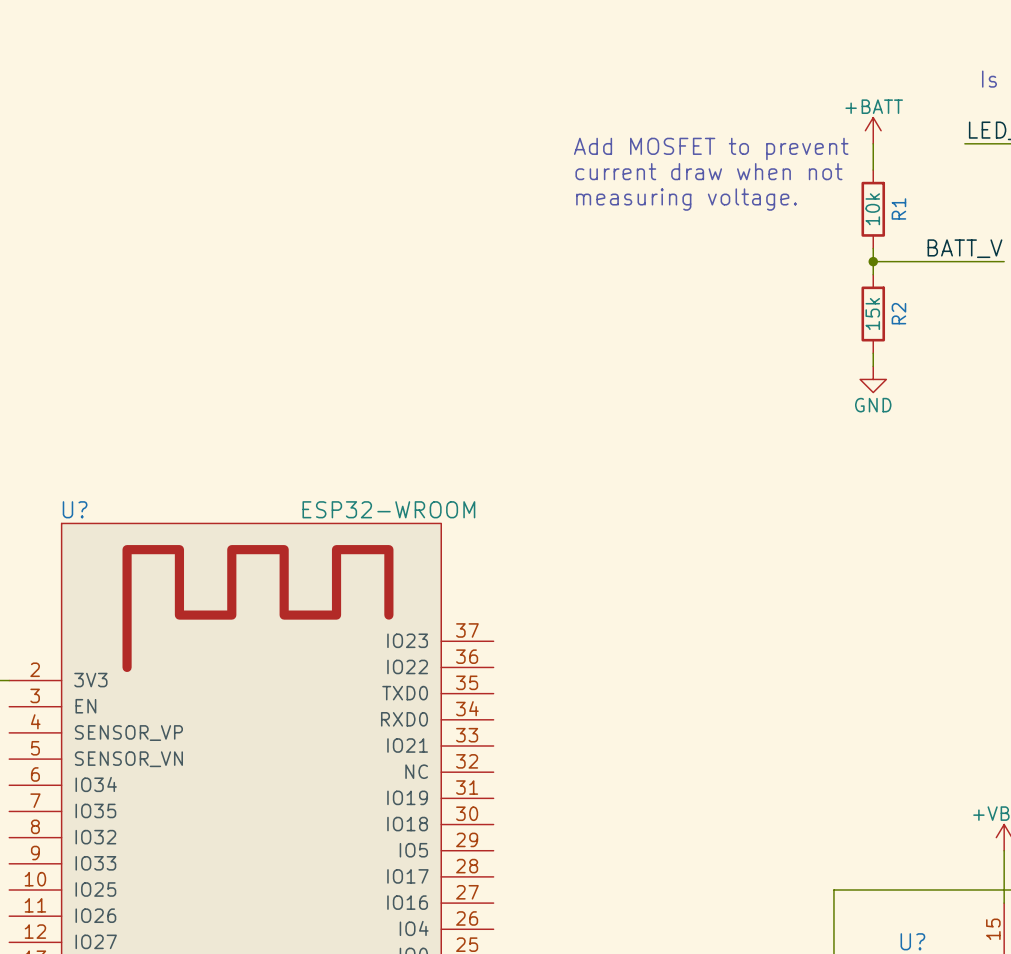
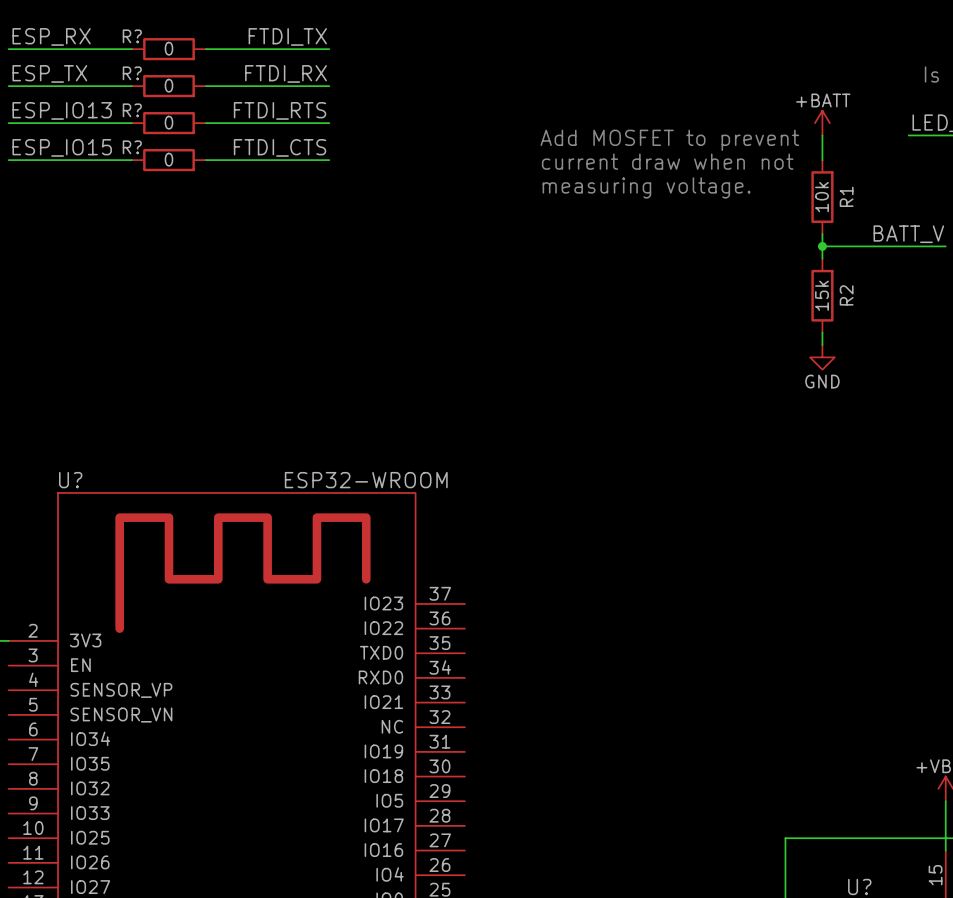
label: none -> ESP_RX (51, 36)
label: none -> FTDI_TX (287, 36)
wire: none -> (8, 49) (132, 49)
R?: none -> 0 (168, 49)
wire: none -> (205, 49) (329, 49)
label: none -> ESP_TX (49, 73)
label: none -> FTDI_RX (286, 73)
wire: none -> (8, 86) (132, 86)
R?: none -> 0 (168, 86)
wire: none -> (205, 86) (329, 86)
label: none -> ESP_IO13 (62, 110)
label: none -> FTDI_RTS (280, 110)
wire: none -> (8, 123) (132, 123)
R?: none -> 0 (168, 123)
wire: none -> (205, 123) (329, 123)
label: none -> ESP_IO15 (62, 147)
label: none -> FTDI_CTS (280, 147)
wire: none -> (8, 160) (132, 160)
R?: none -> 0 (168, 160)
wire: none -> (205, 160) (329, 160)

